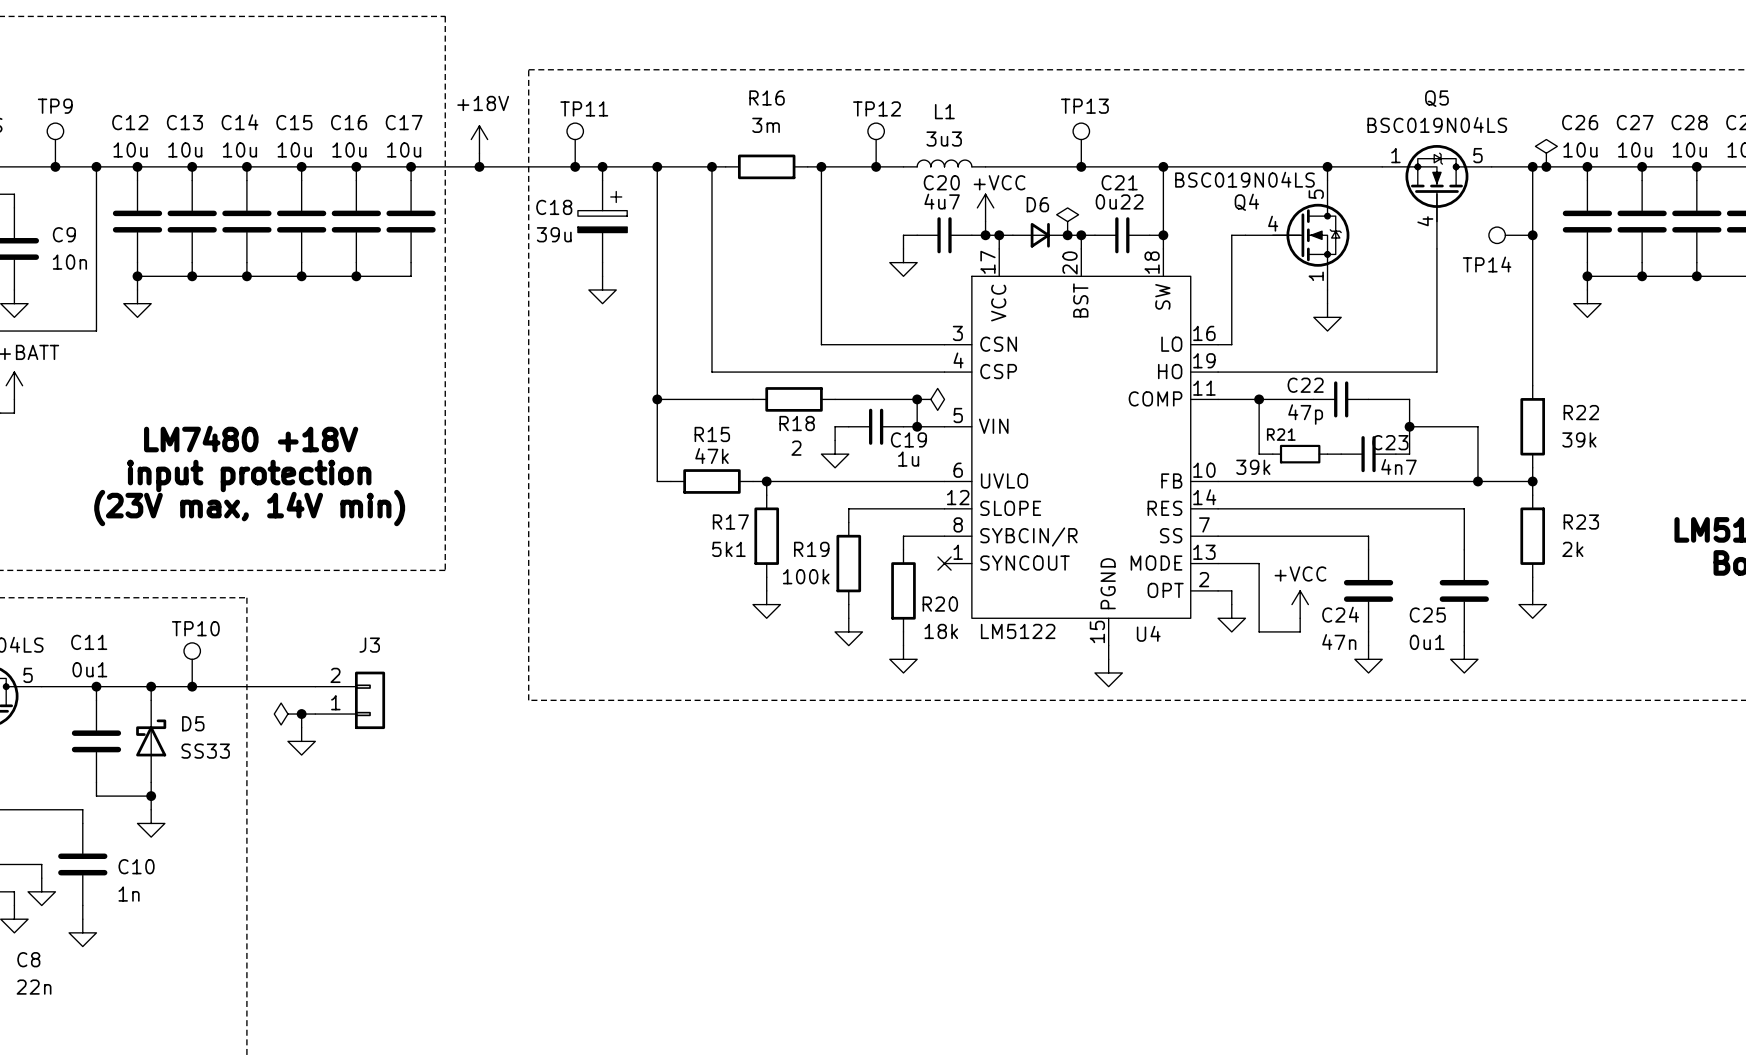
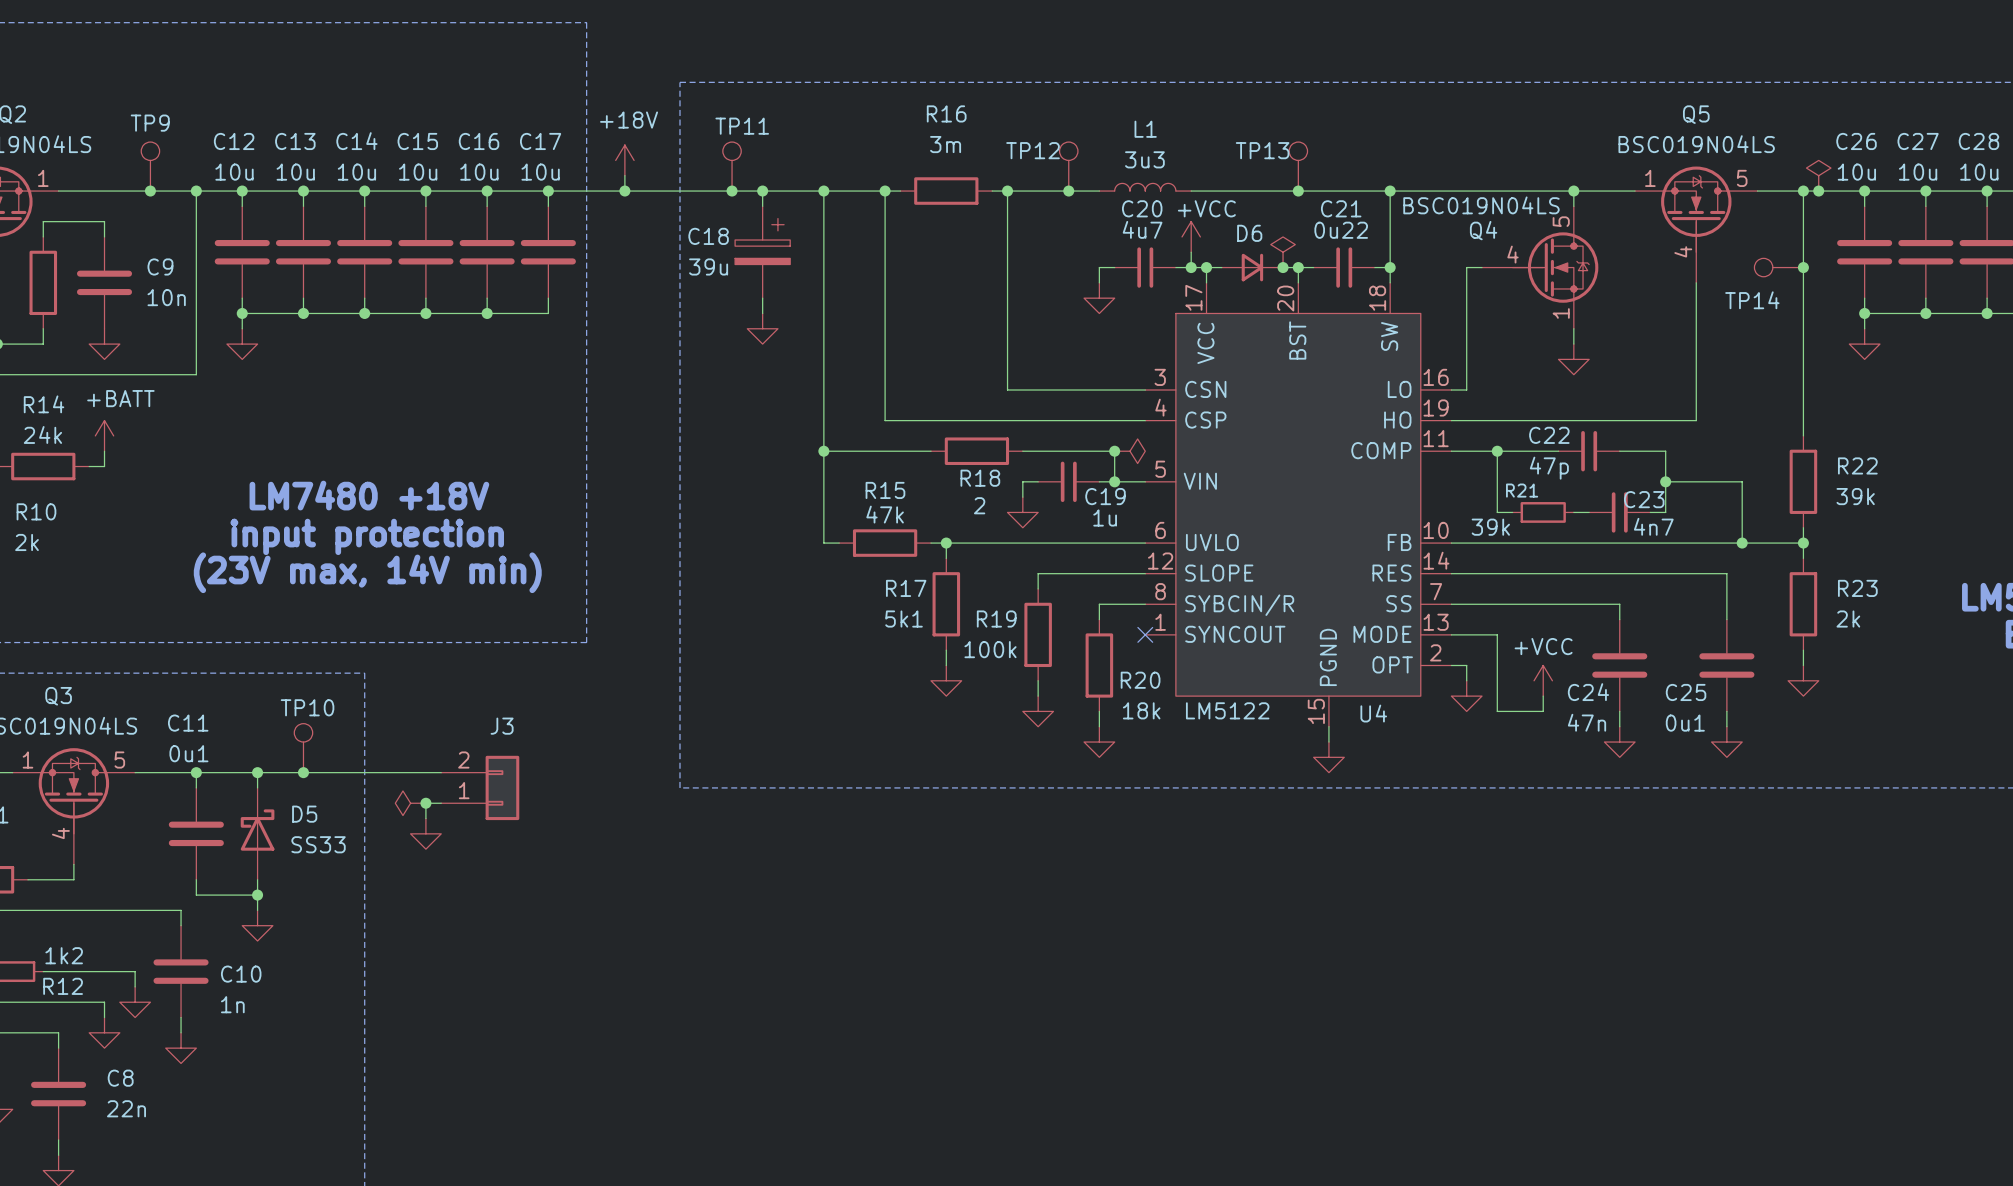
TP13 name position: TP13 (1084, 106) -> TP13 (1262, 150)
TP12 name position: TP12 (877, 108) -> TP12 (1033, 150)

